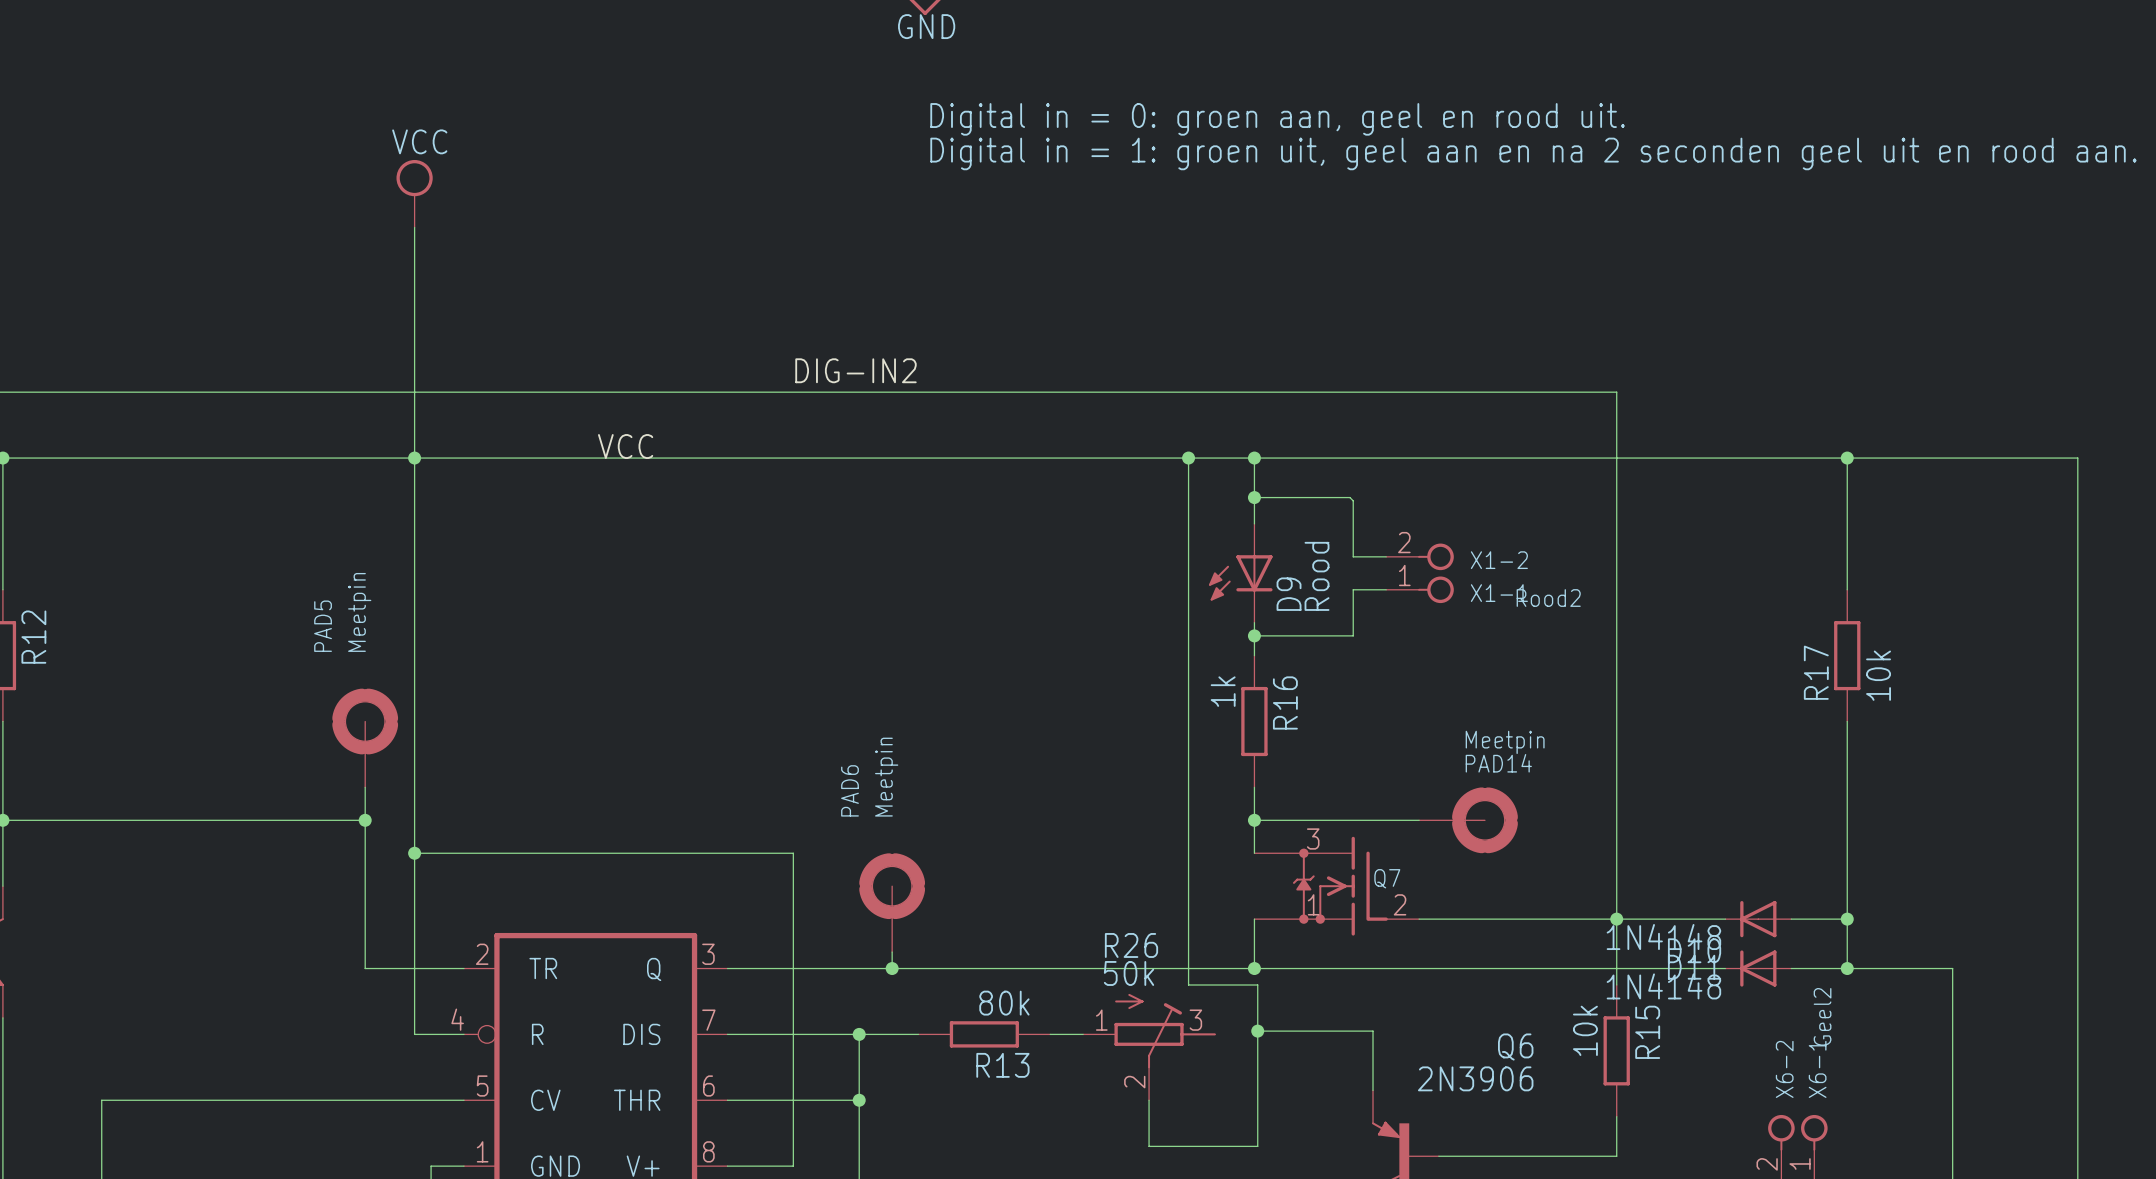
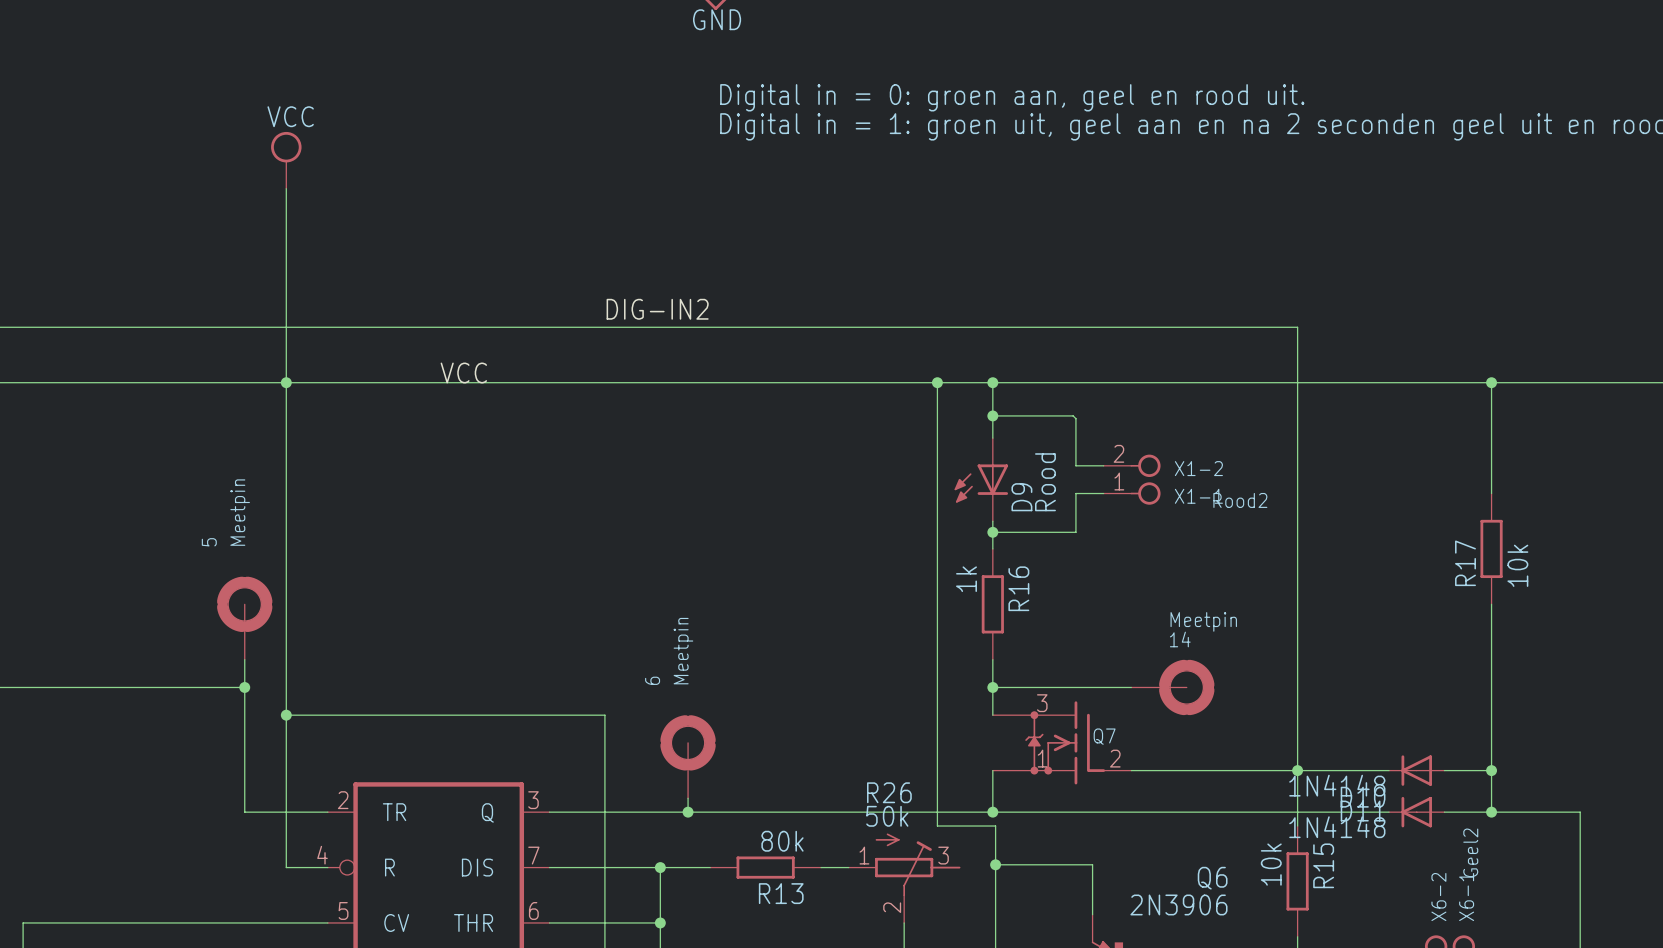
PAD5 name: PAD5 (323, 626) -> 5 (209, 542)
PAD14 name: PAD14 (1498, 763) -> 14 (1180, 639)
PAD6 name: PAD6 (850, 790) -> 6 (652, 680)

